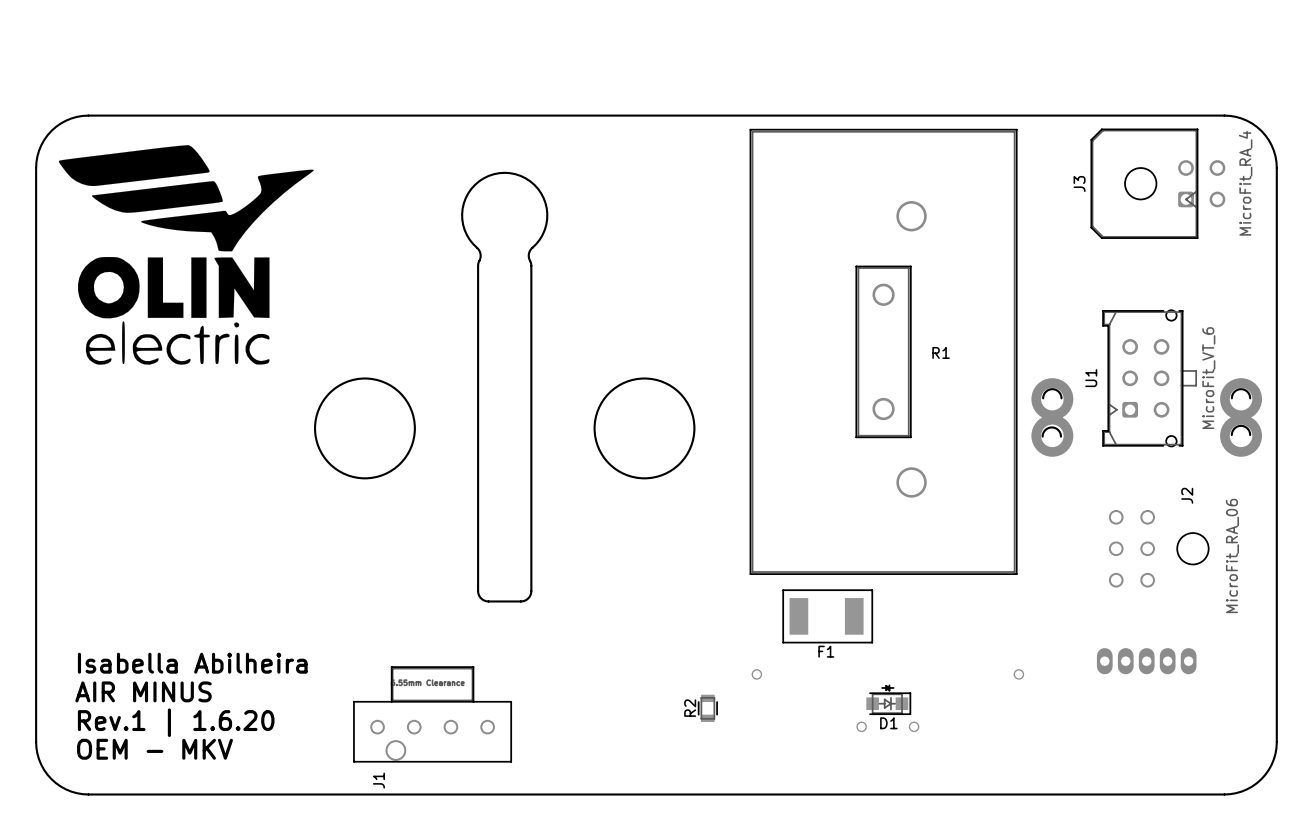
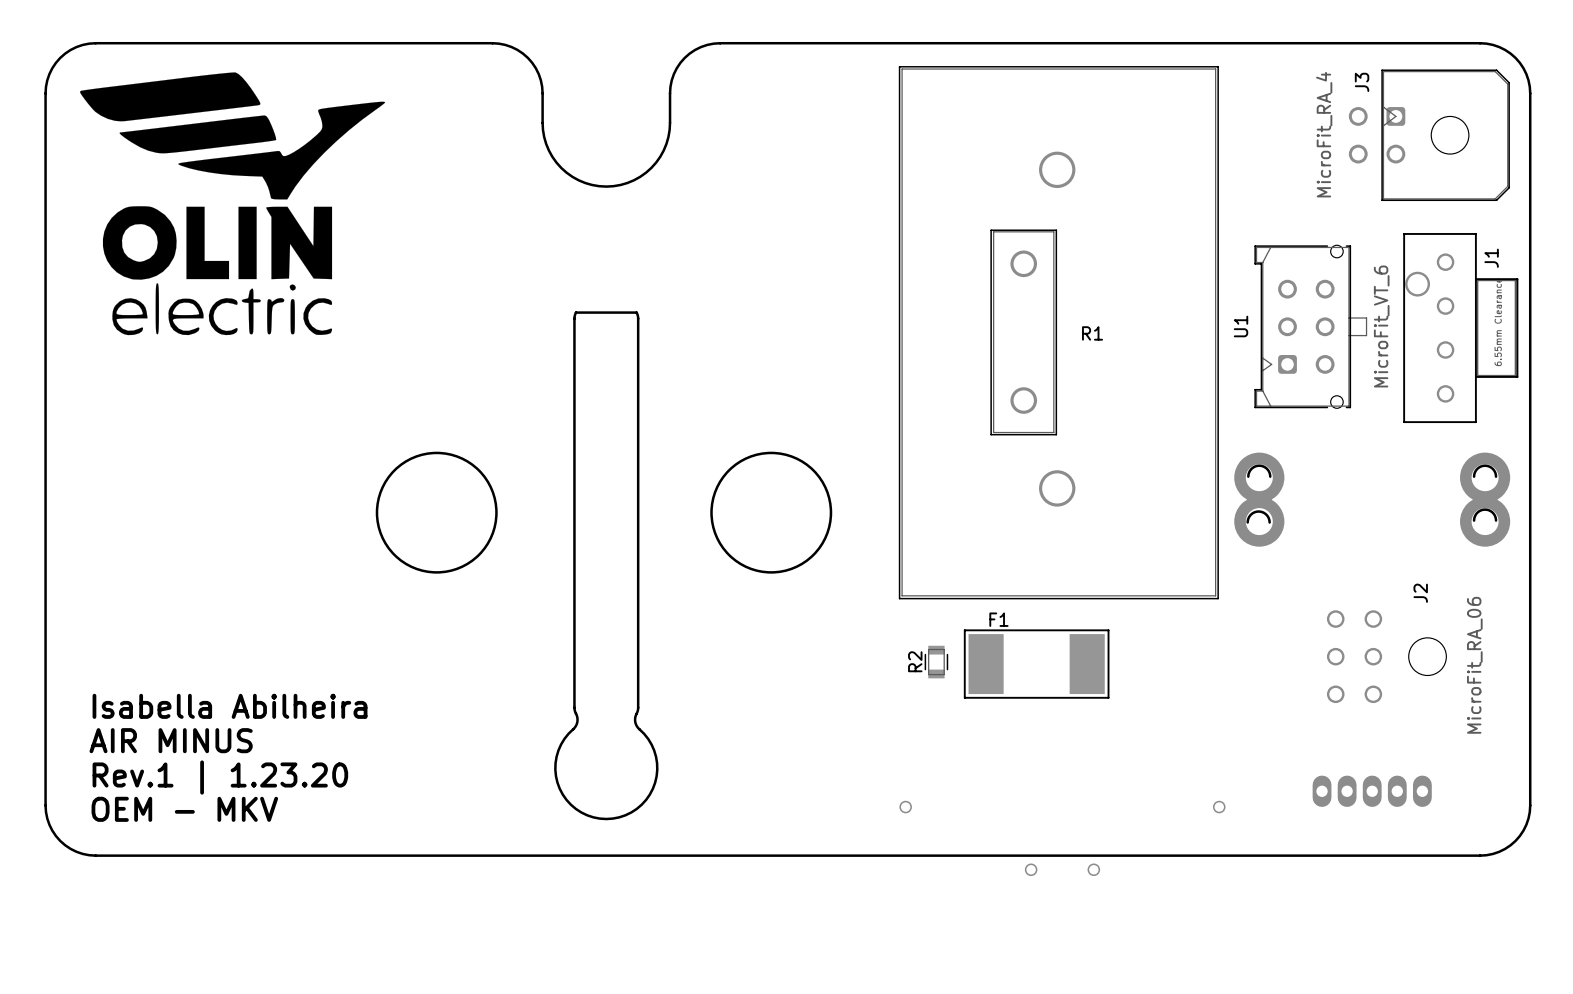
board edge: (88, 115) (1224, 115) (1247, 120) (1261, 130) (1268, 140) (1273, 150) (1276, 168) (1276, 742) (1271, 764) (1261, 779) (1252, 786) (1241, 791) (1224, 794) (88, 794) (65, 789) (51, 779) (44, 769) (39, 759) (36, 742) (36, 168) (39, 150) (51, 130) (71, 118) (88, 115) -> (95, 43) (492, 43) (505, 44) (522, 53) (532, 62) (538, 74) (542, 86) (544, 137) (548, 150) (556, 162) (566, 172) (578, 180) (592, 184) (606, 186) (620, 184) (633, 180) (646, 172) (656, 162) (663, 150) (668, 137) (670, 86) (673, 74) (680, 62) (689, 53) (701, 47) (713, 43) (1480, 43) (1493, 44) (1505, 49) (1515, 57) (1523, 68) (1528, 80) (1530, 93) (1530, 805) (1528, 818) (1523, 830) (1515, 840) (1505, 848) (1493, 853) (1480, 855) (95, 855) (82, 853) (70, 848) (60, 840) (52, 830) (47, 818) (45, 805) (45, 93) (49, 74) (60, 57) (76, 47) (95, 43)
R1 footprint: [749, 129, 1018, 575] -> [898, 66, 1219, 600]
J3 name position: J3 (1079, 183) -> J3 (1362, 82)
J3 rotation: 0° (1158, 183) -> 180° (1429, 135)
drawing position: (186, 254) -> (232, 203)
board edge: (478, 265) (478, 592) (481, 598) (485, 601) (522, 601) (528, 598) (531, 590) (531, 265) (528, 255) (542, 235) (547, 213) (541, 193) (525, 178) (510, 173) (493, 174) (479, 181) (468, 193) (462, 208) (462, 219) (466, 235) (480, 252) (478, 265) -> (576, 312) (574, 318) (574, 707) (577, 720) (575, 727) (561, 744) (556, 756) (555, 769) (559, 788) (570, 804) (581, 812) (593, 817) (612, 818) (625, 815) (641, 804) (652, 788) (657, 769) (656, 756) (651, 744) (637, 727) (635, 720) (638, 707) (638, 317) (636, 312) (576, 312)
R1 name position: R1 (941, 352) -> R1 (1092, 333)
U1 position: (1149, 378) -> (1310, 326)
F1 footprint: [782, 589, 874, 644] -> [963, 629, 1110, 699]
text: none -> Rev.1 | 1.23.20 (220, 777)
F1 name position: F1 (826, 651) -> F1 (998, 619)
text position: Isabella Abilheira (192, 663) -> Isabella Abilheira (230, 706)
text position: AIR MINUS (143, 691) -> AIR MINUS (171, 740)
D1: (888, 699) -> none
R2 position: (707, 708) -> (936, 662)
J1 rotation: 0° (432, 714) -> 90° clockwise (1460, 328)
J1 position: (432, 714) -> (1460, 328)
text: Rev.1 | 1.6.20 (176, 722) -> none
text position: OEM - MKV (154, 749) -> OEM - MKV (184, 809)
J1 name position: J1 (378, 780) -> J1 (1491, 258)

